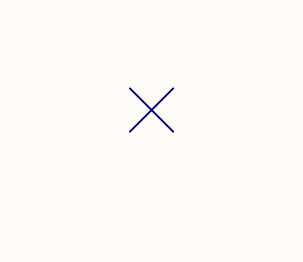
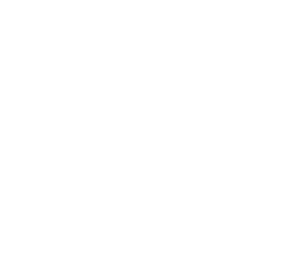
no-connect mark: (151, 110) -> none

